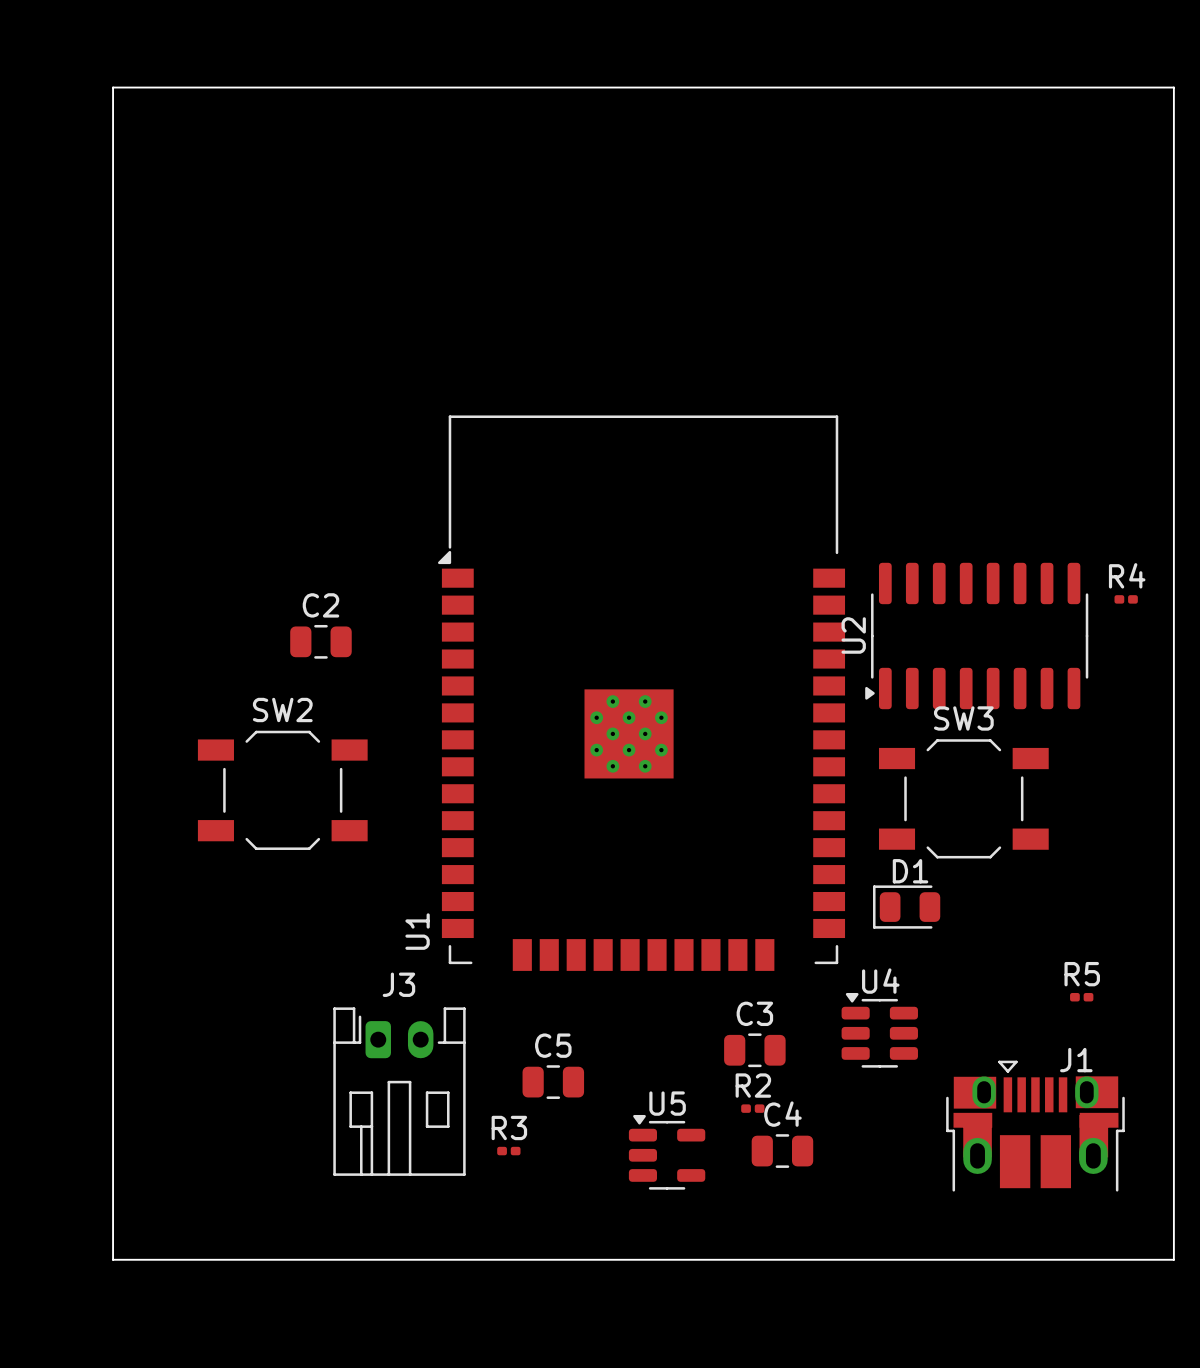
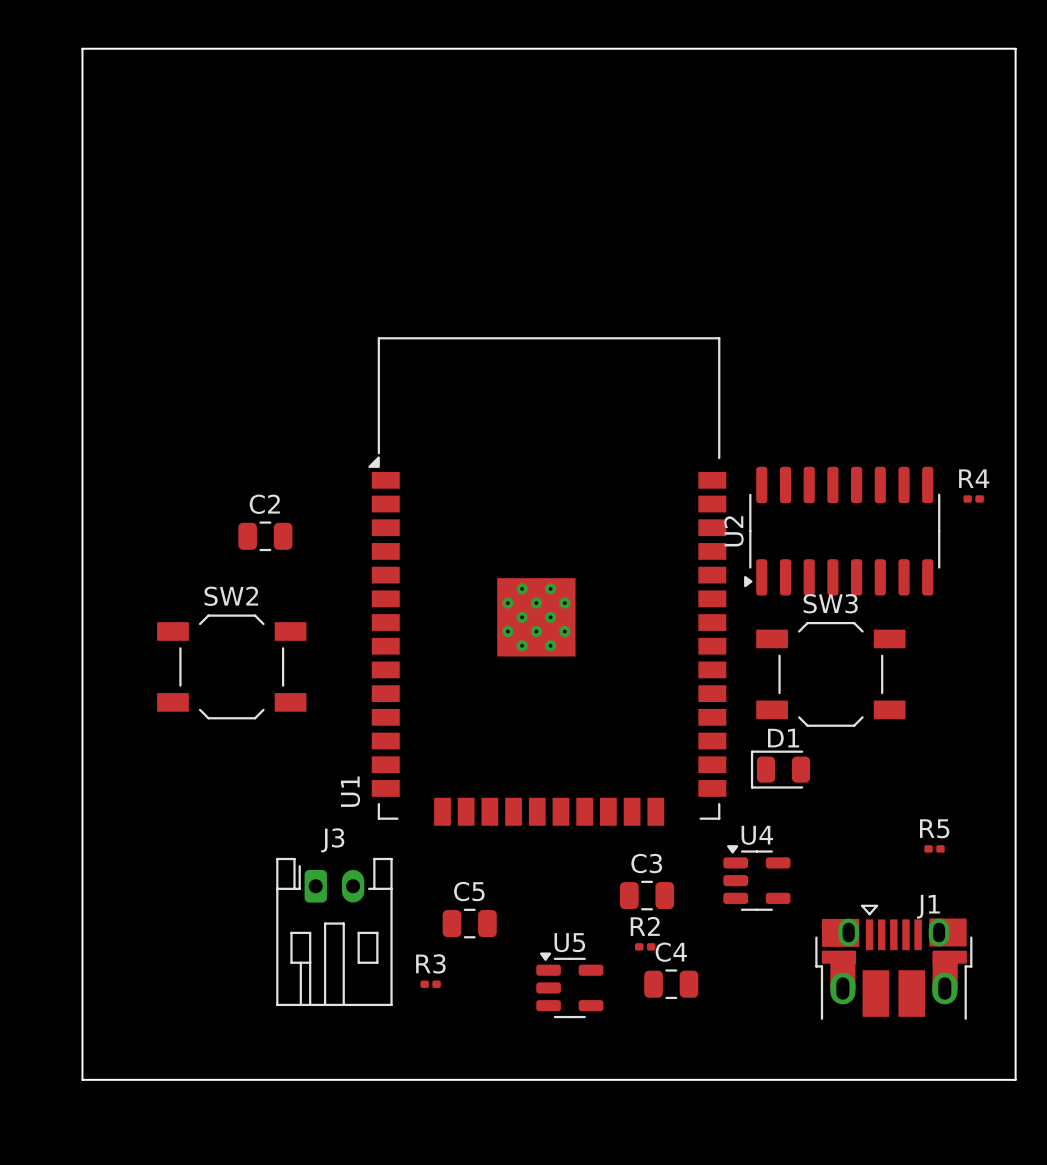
U4 footprint: [841, 992, 918, 1068] -> [723, 845, 791, 911]

